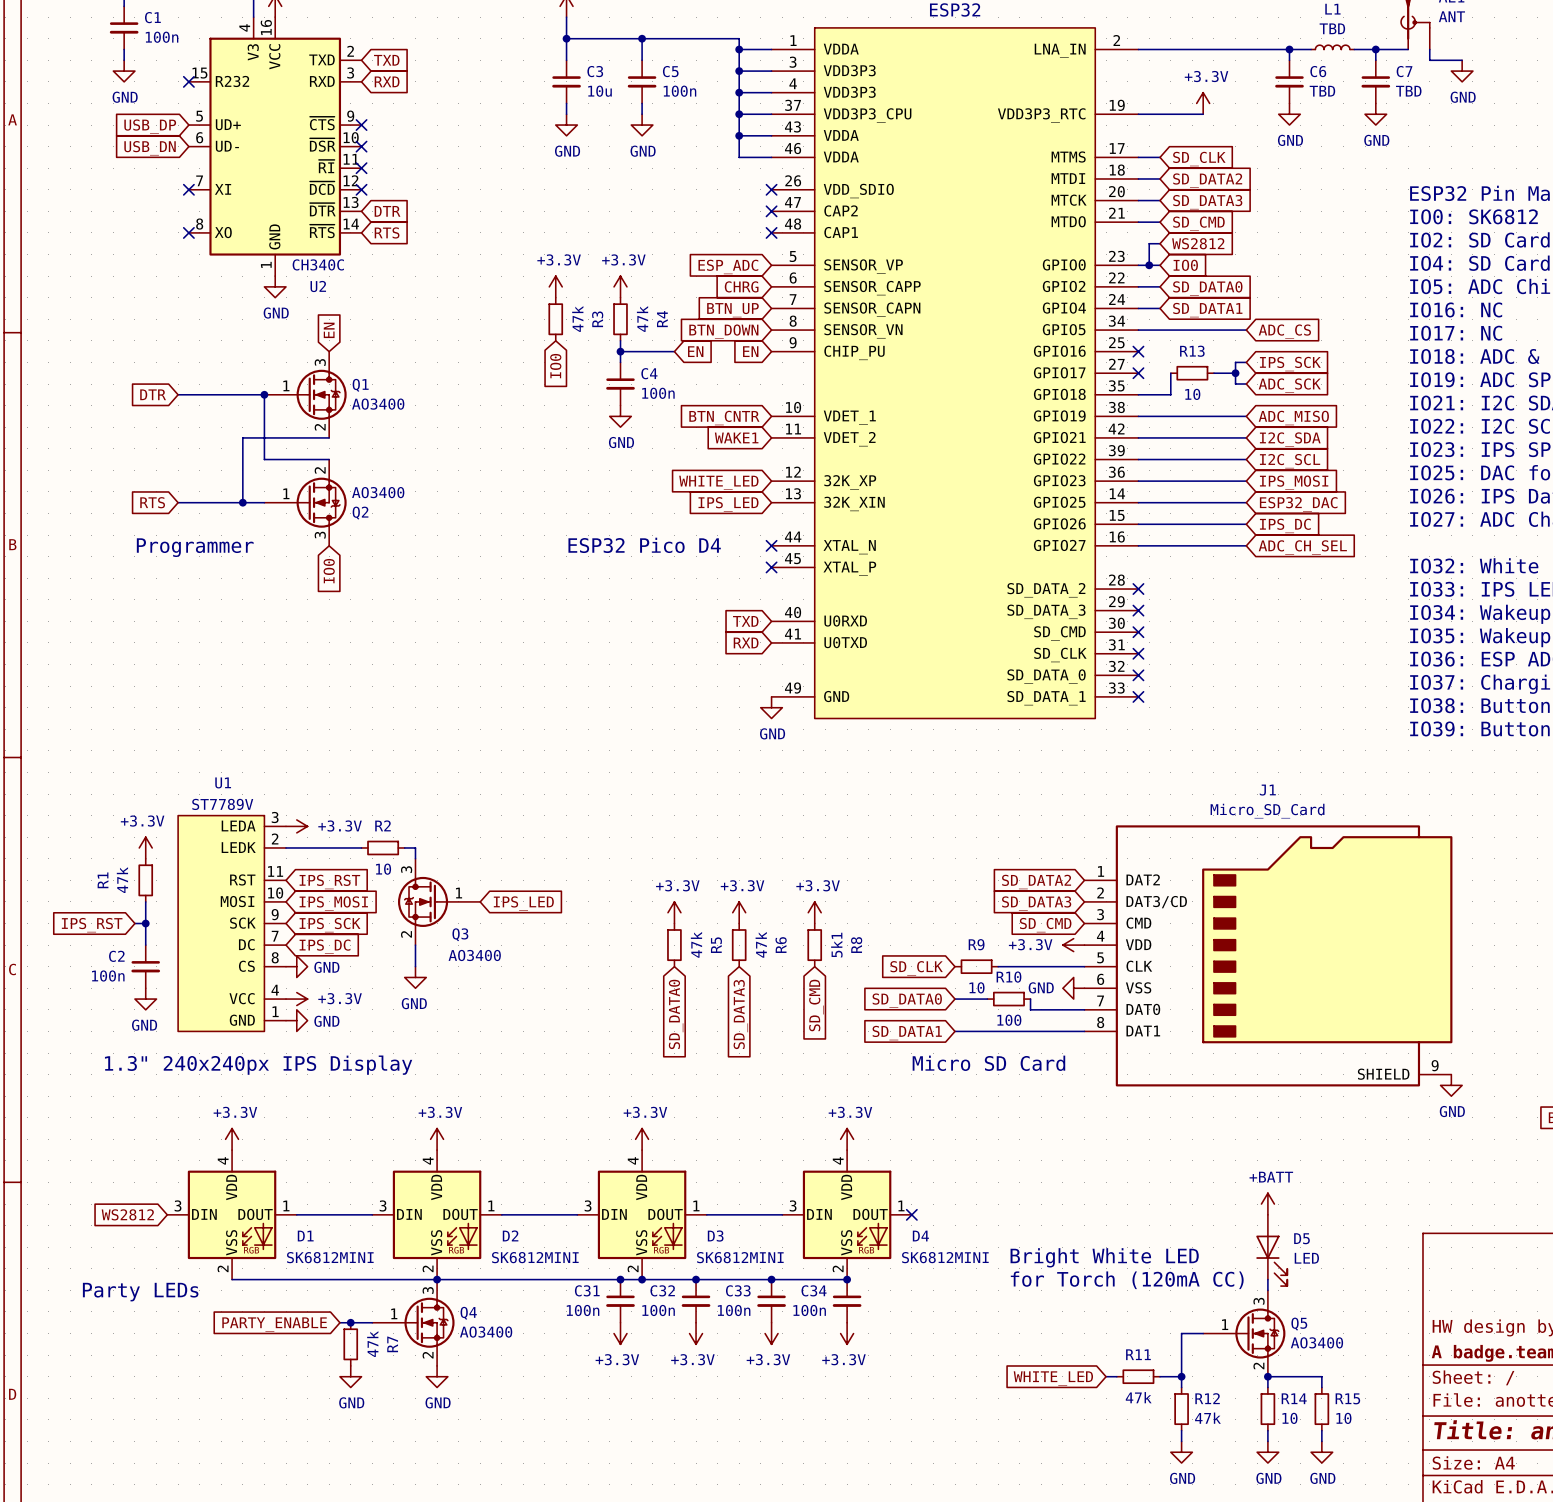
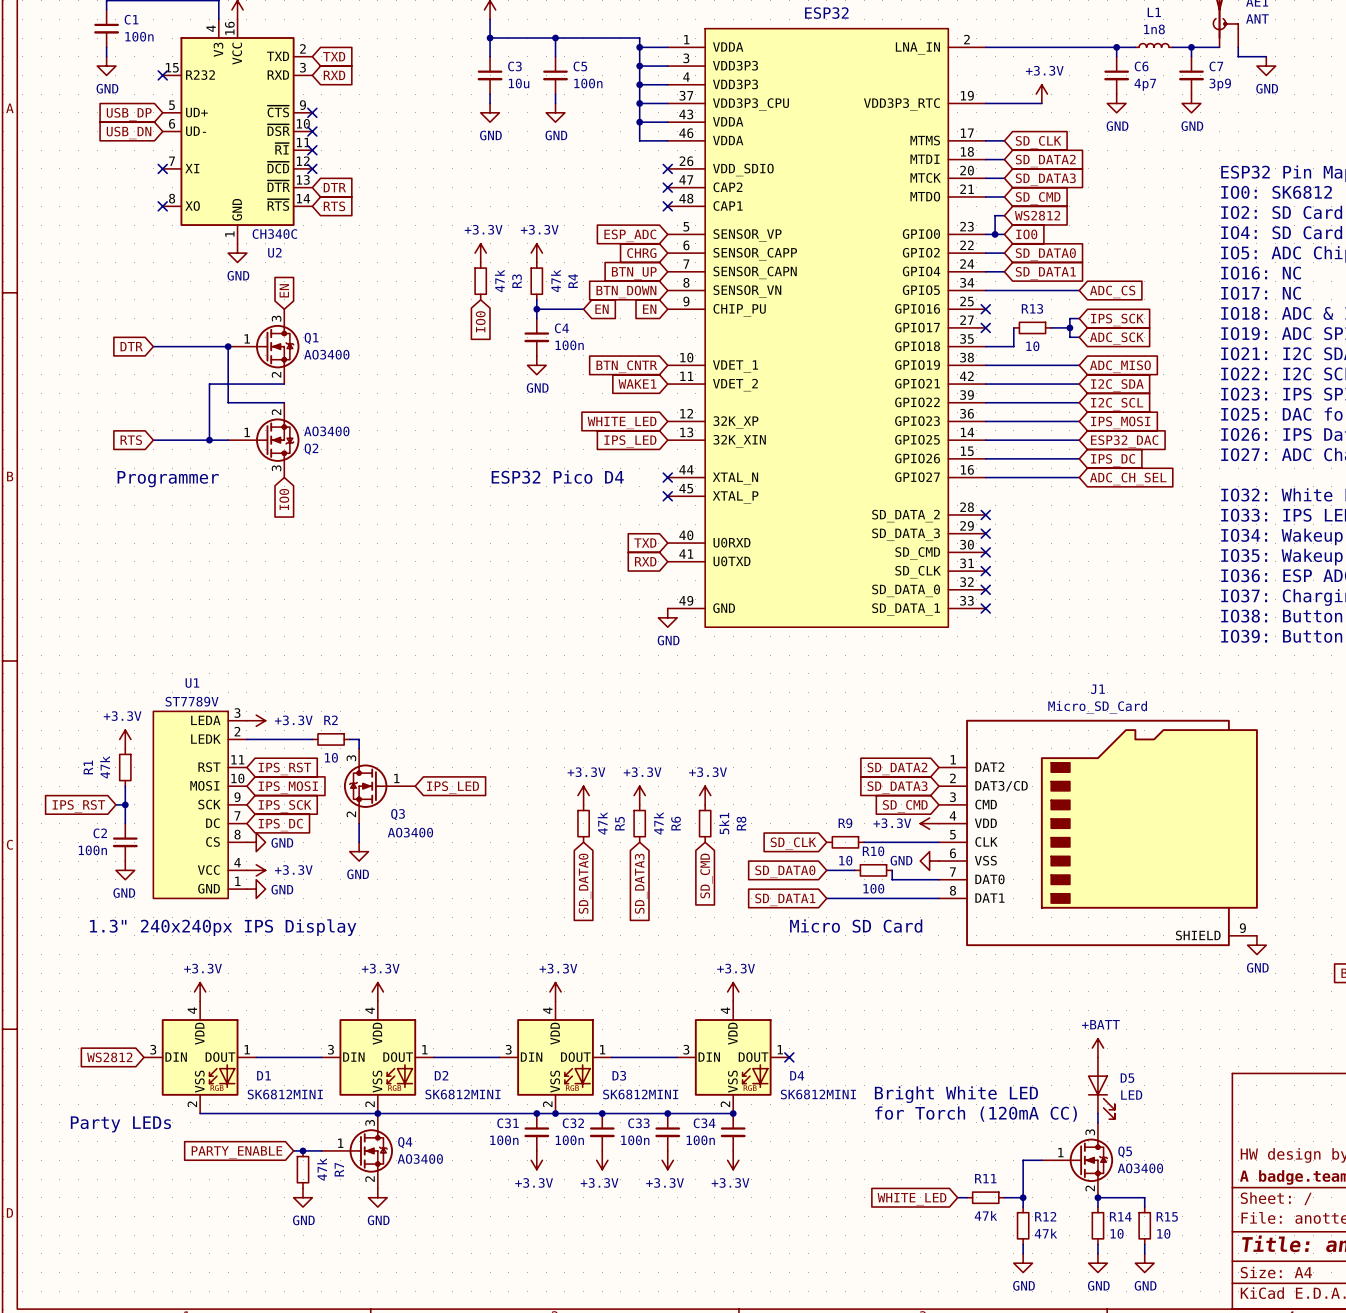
L1 value: TBD (1332, 28) -> 1n8 (1154, 29)
C6 value: TBD (1322, 91) -> 4p7 (1145, 84)
C7 value: TBD (1408, 91) -> 3p9 (1220, 84)

